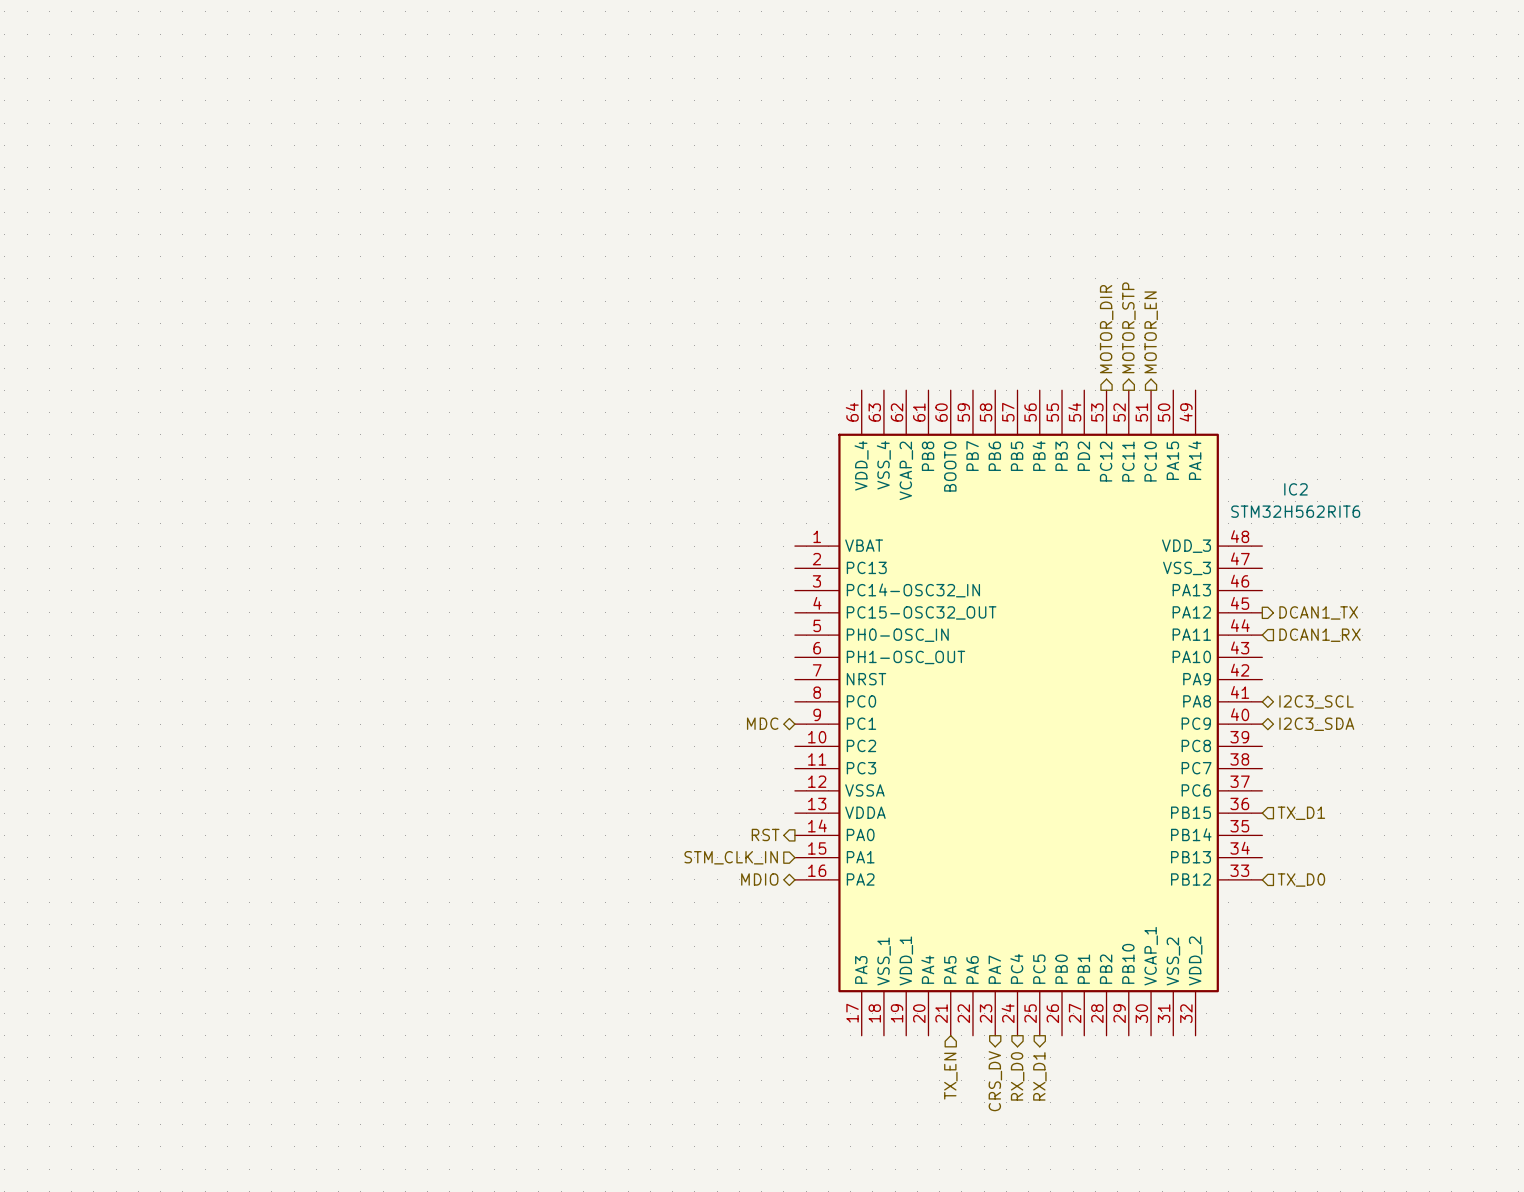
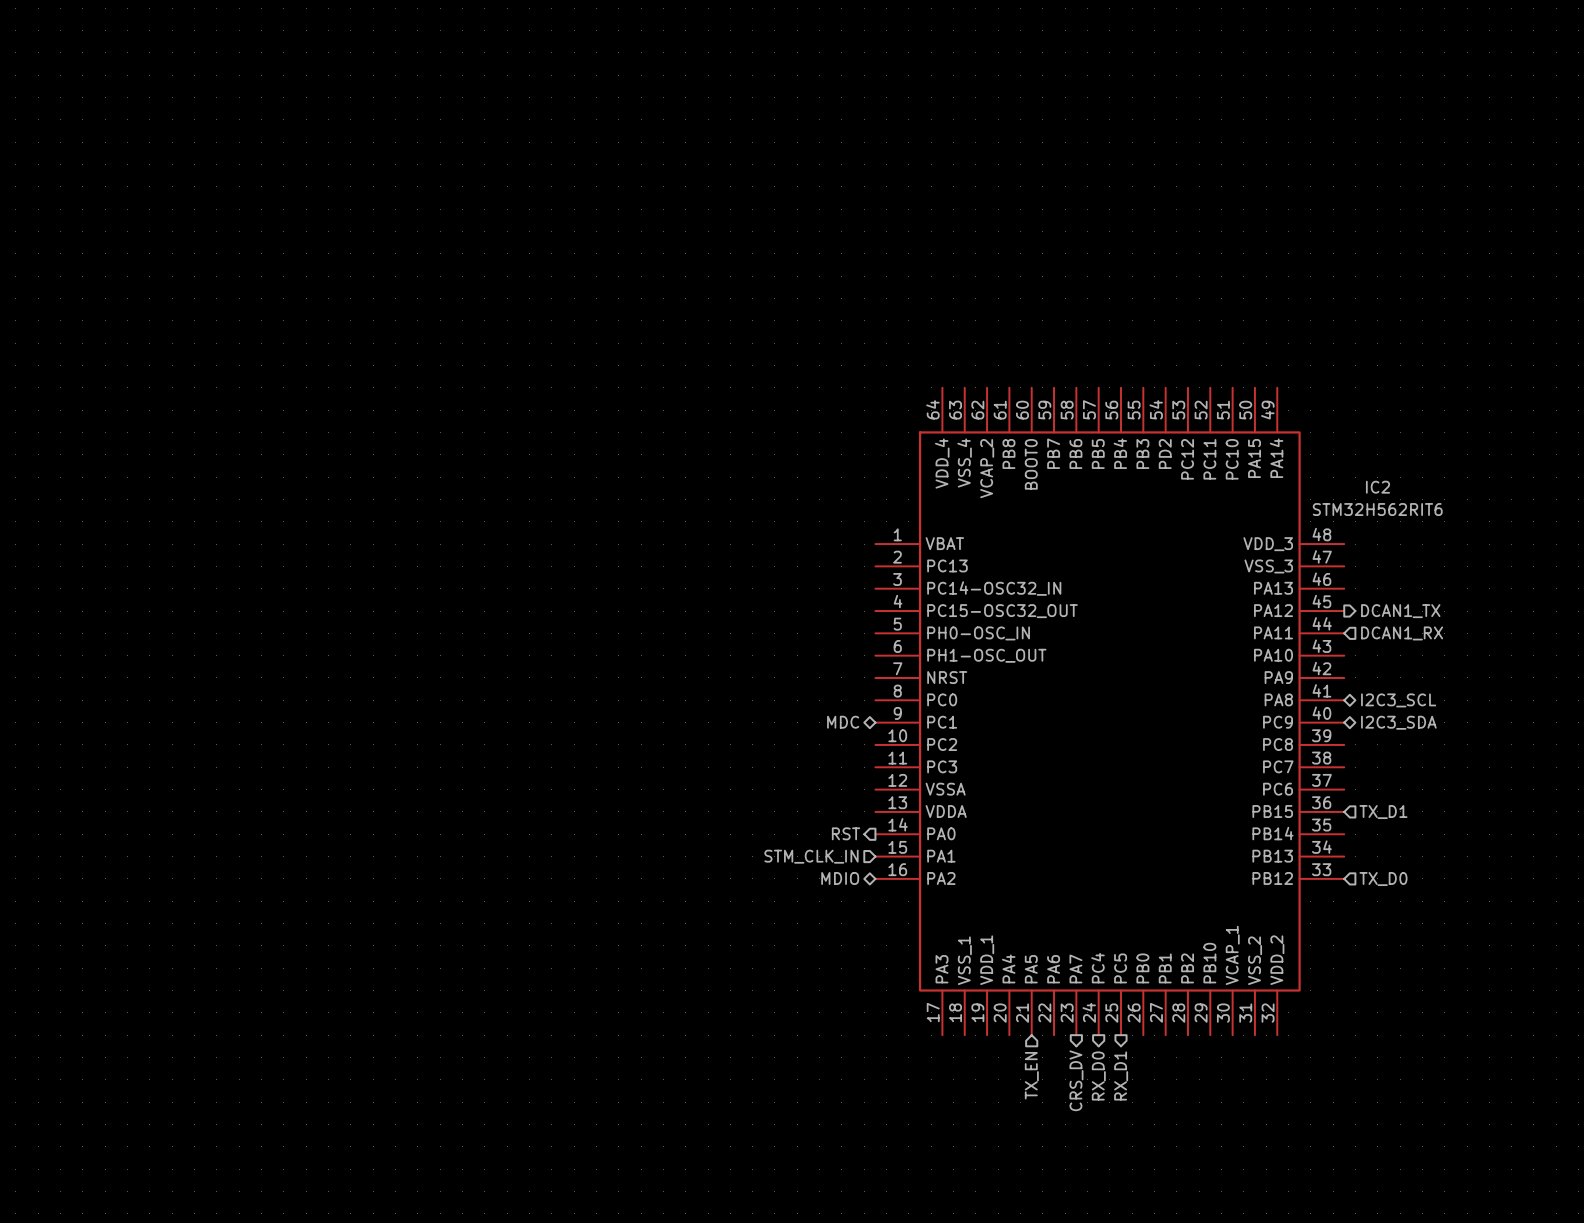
hierarchical label: MOTOR_STP (1128, 327) -> none
hierarchical label: MOTOR_DIR (1106, 329) -> none
hierarchical label: MOTOR_EN (1151, 332) -> none

